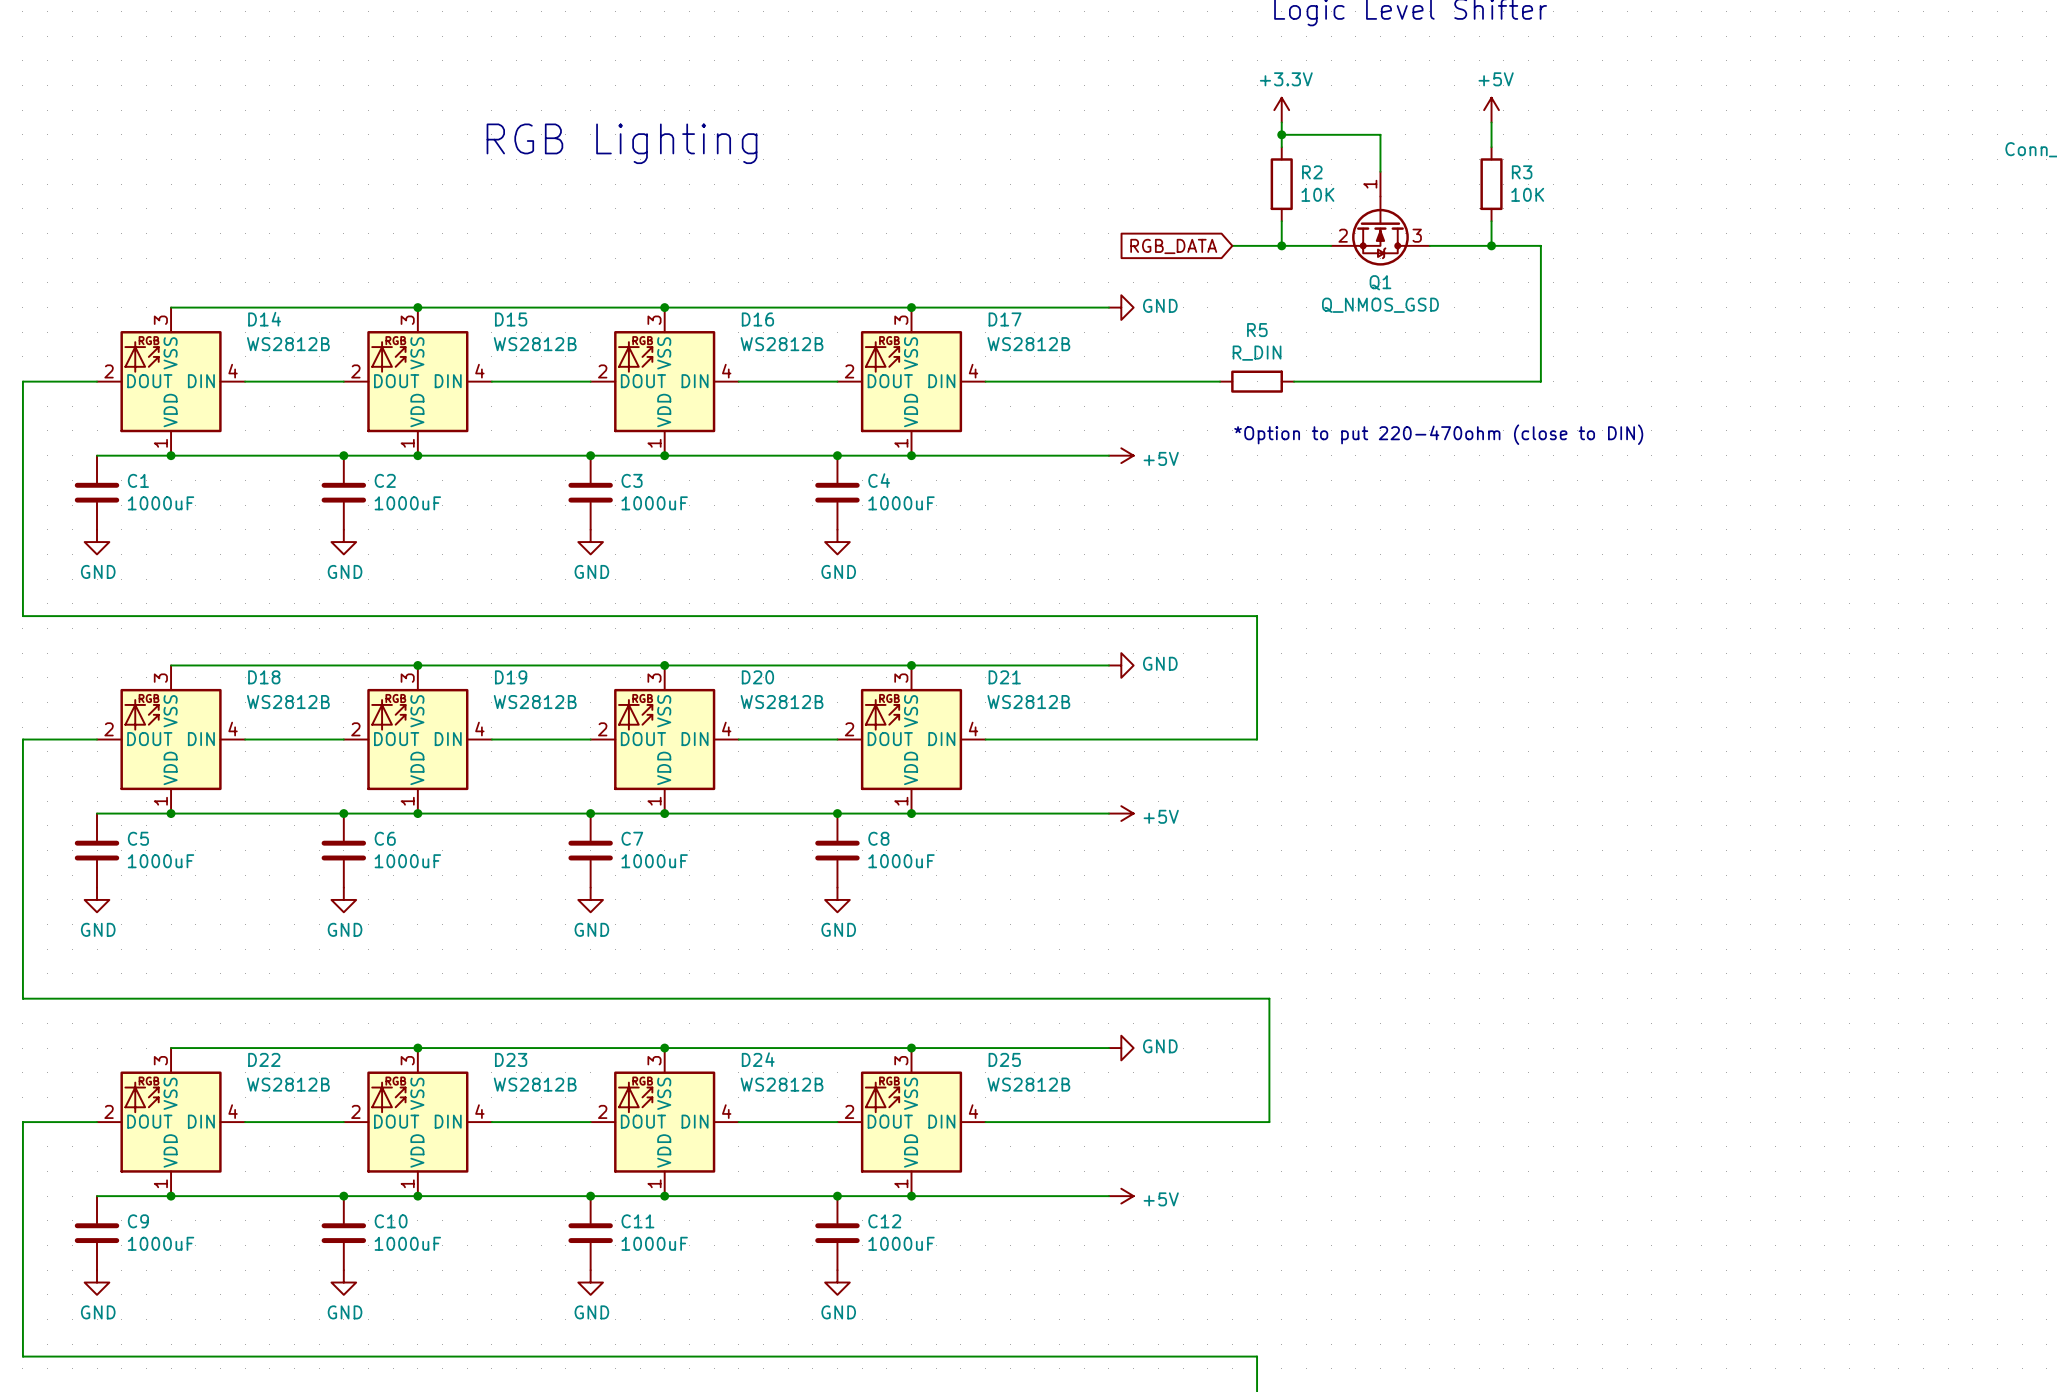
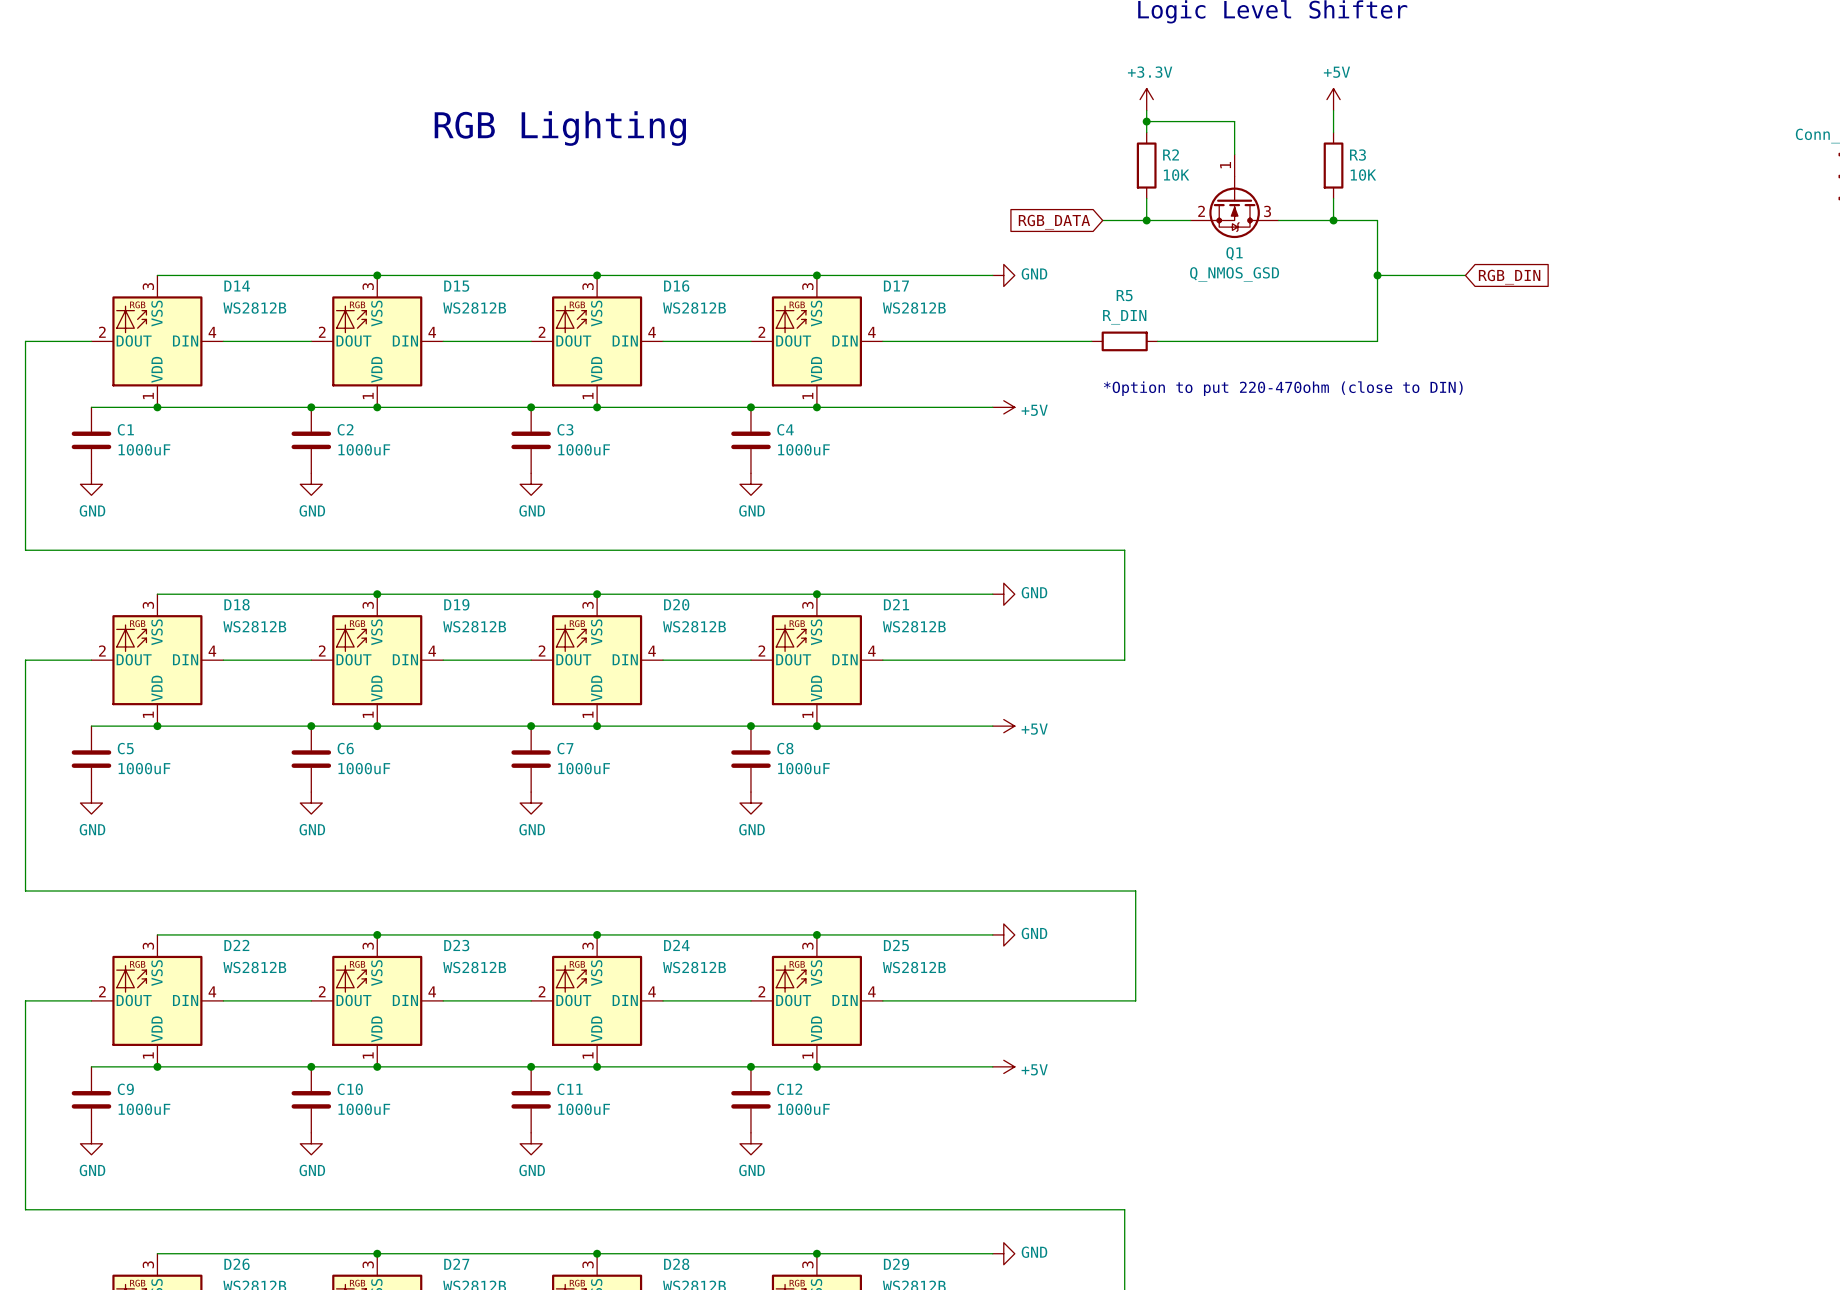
wire: none -> (1377, 275) (1465, 275)
junction: none -> (1377, 275)
global label: none -> RGB_DIN (1509, 277)

